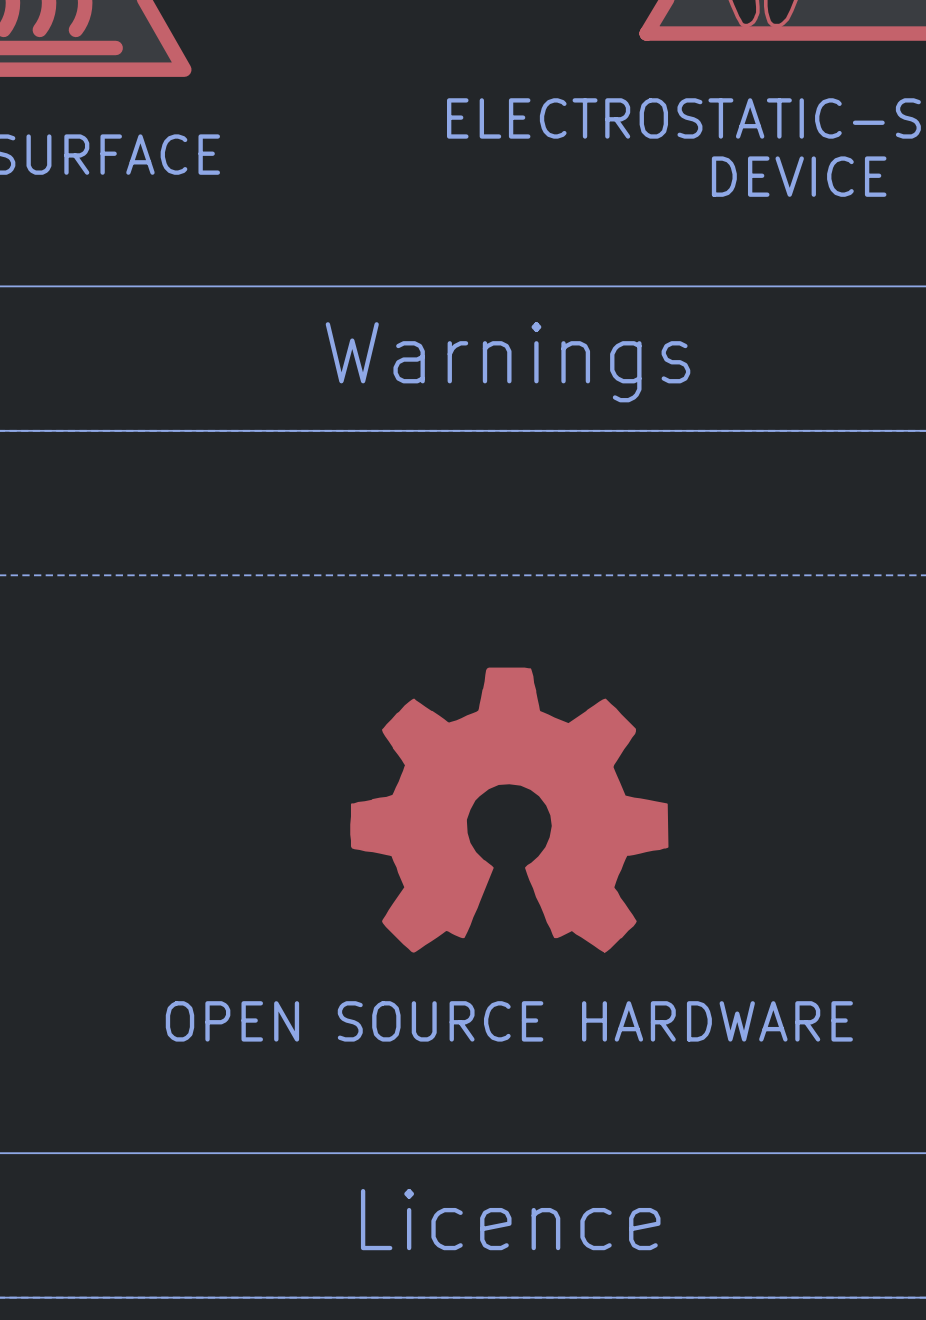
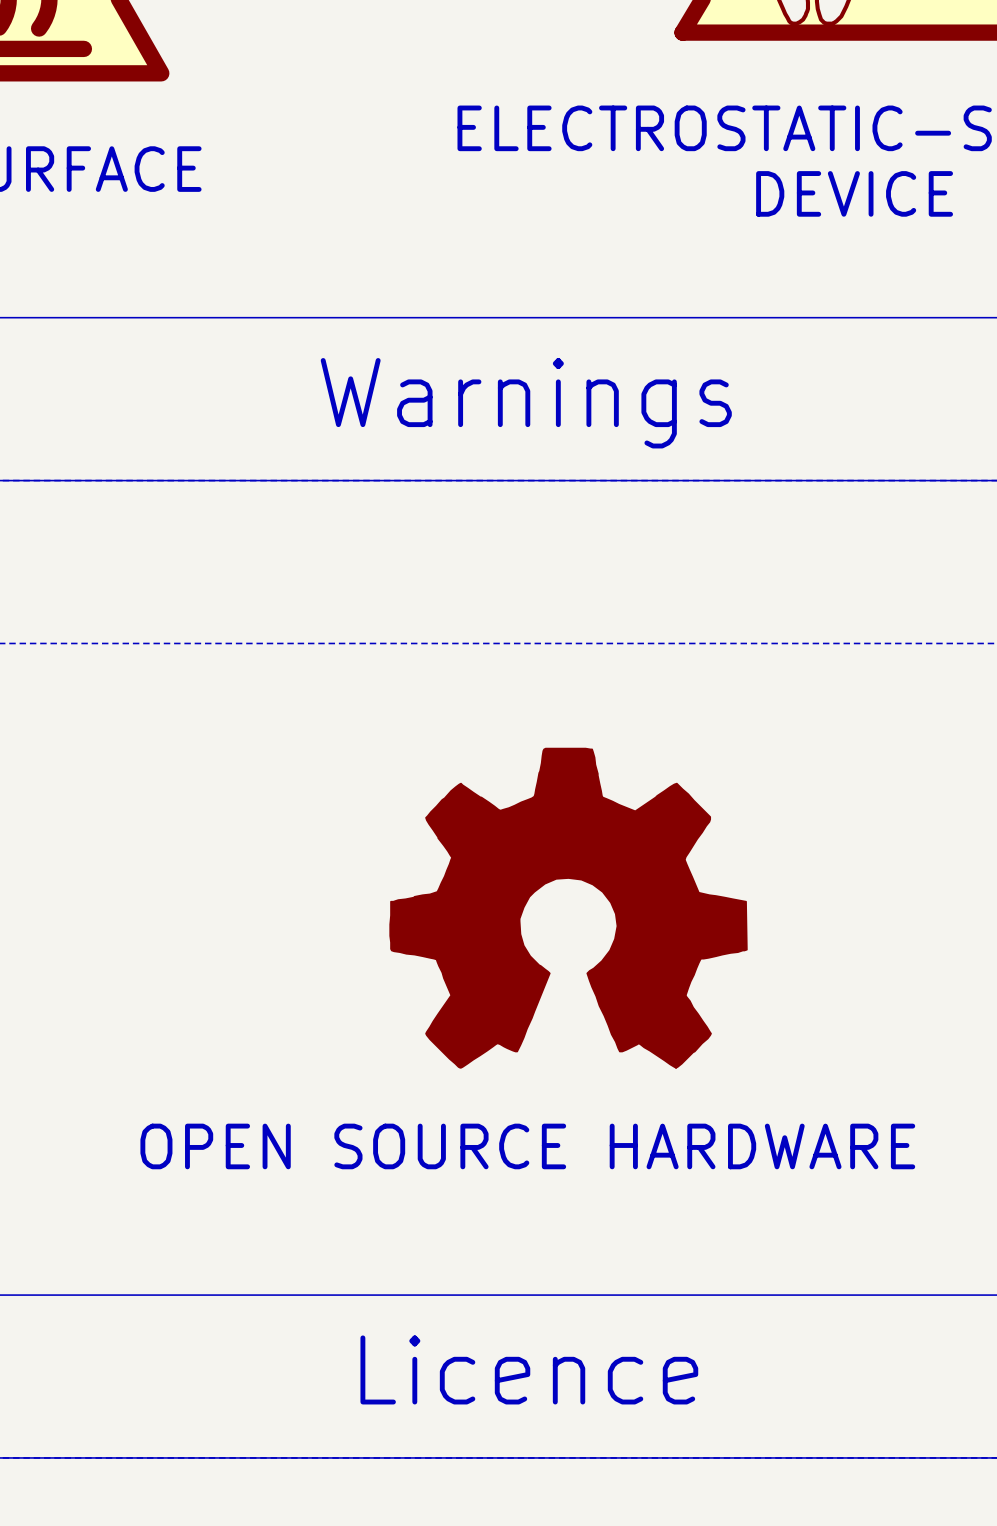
power symbol position: (509, 810) -> (568, 908)

